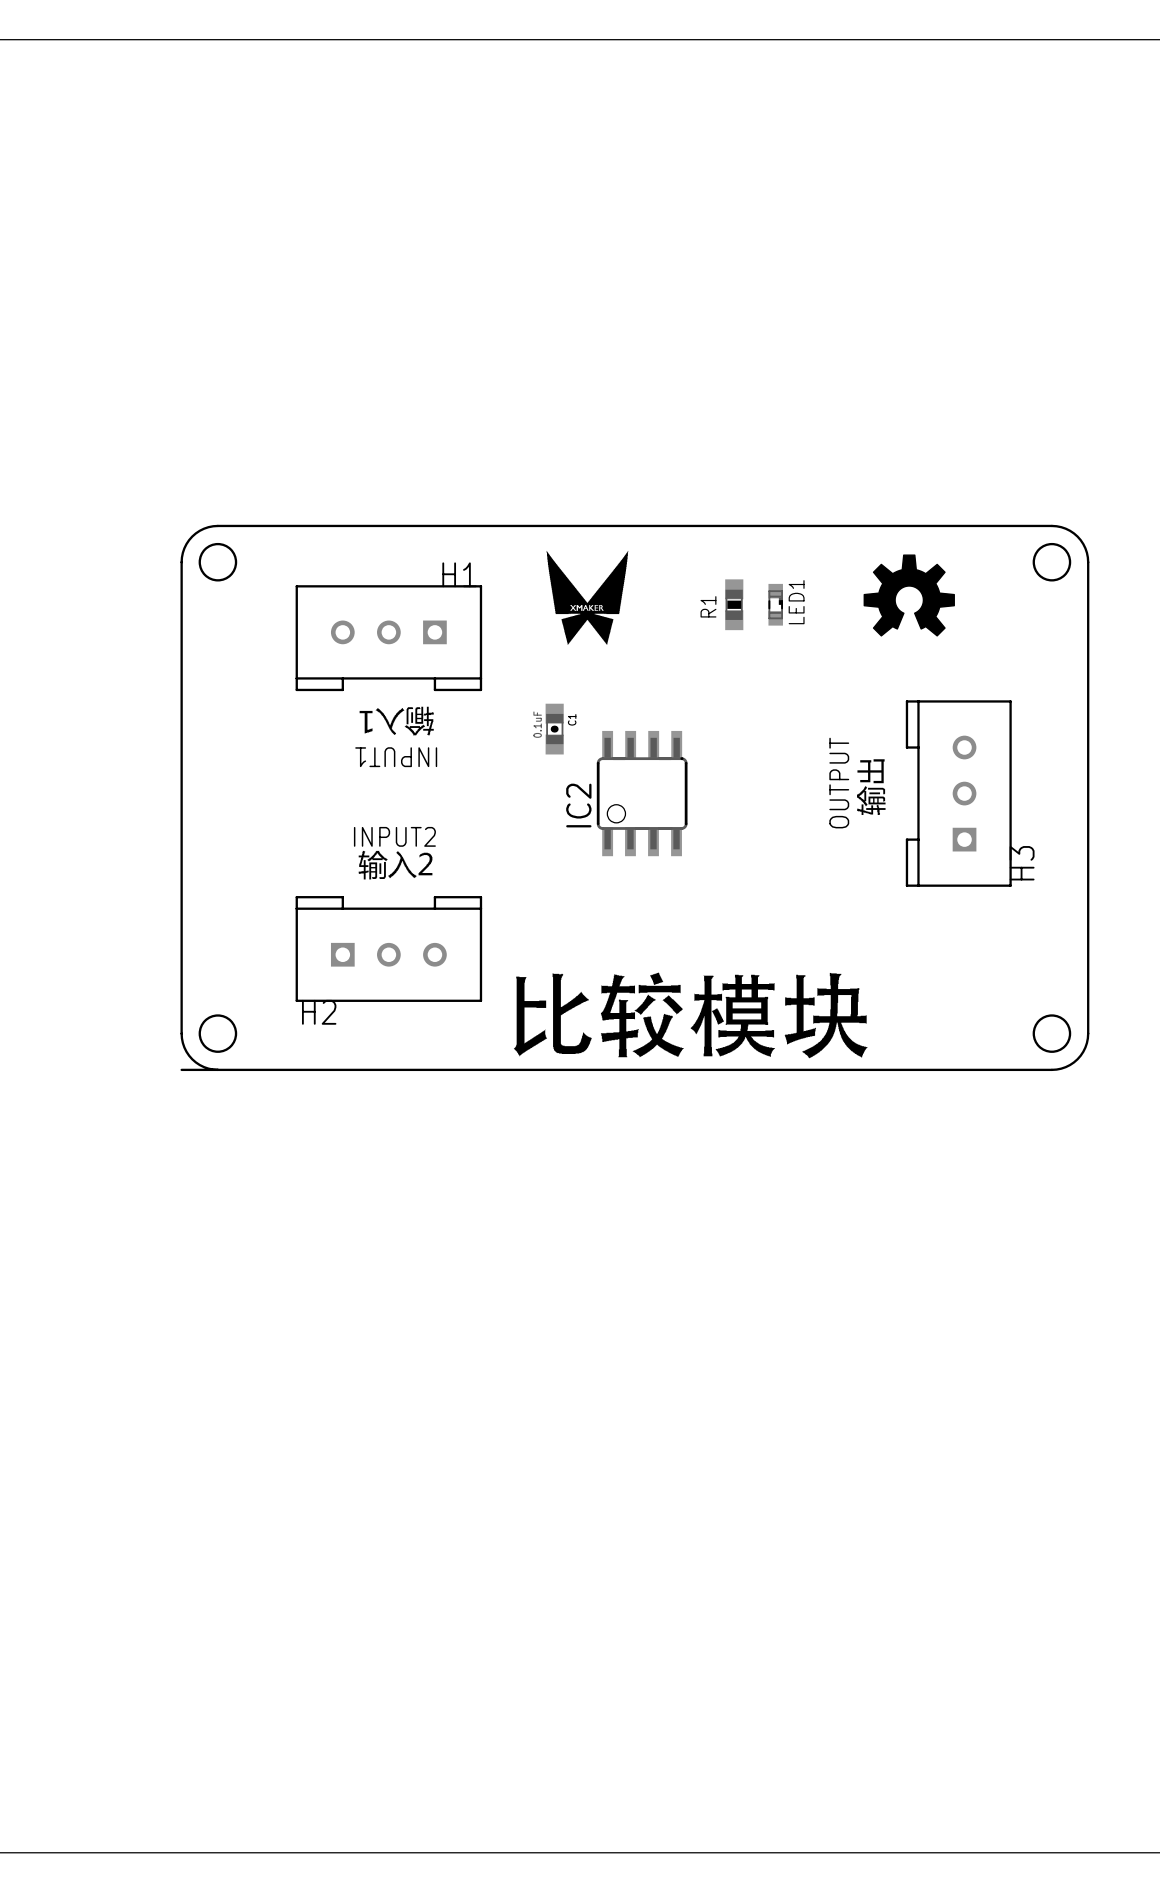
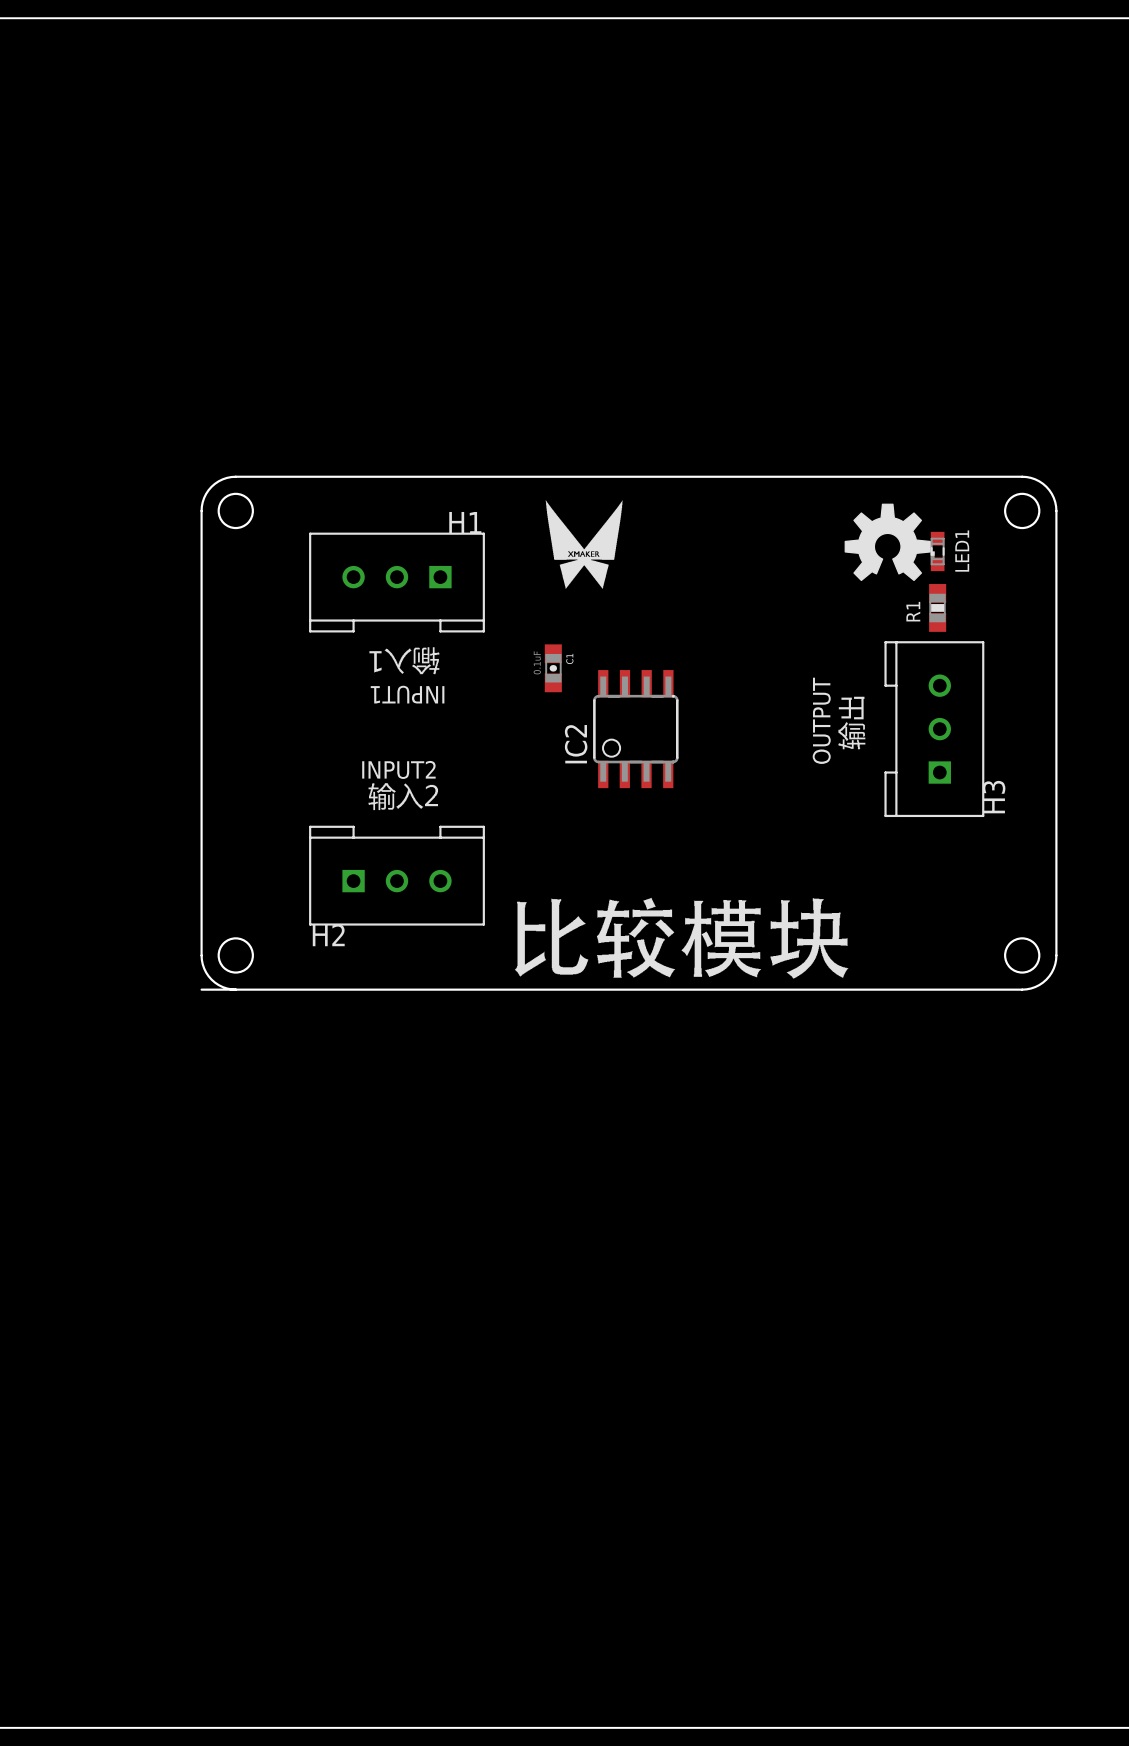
R1 position: (734, 604) -> (937, 607)
LED1 rotation: 0° (775, 604) -> 180° (937, 551)
LED1 position: (775, 604) -> (937, 551)

